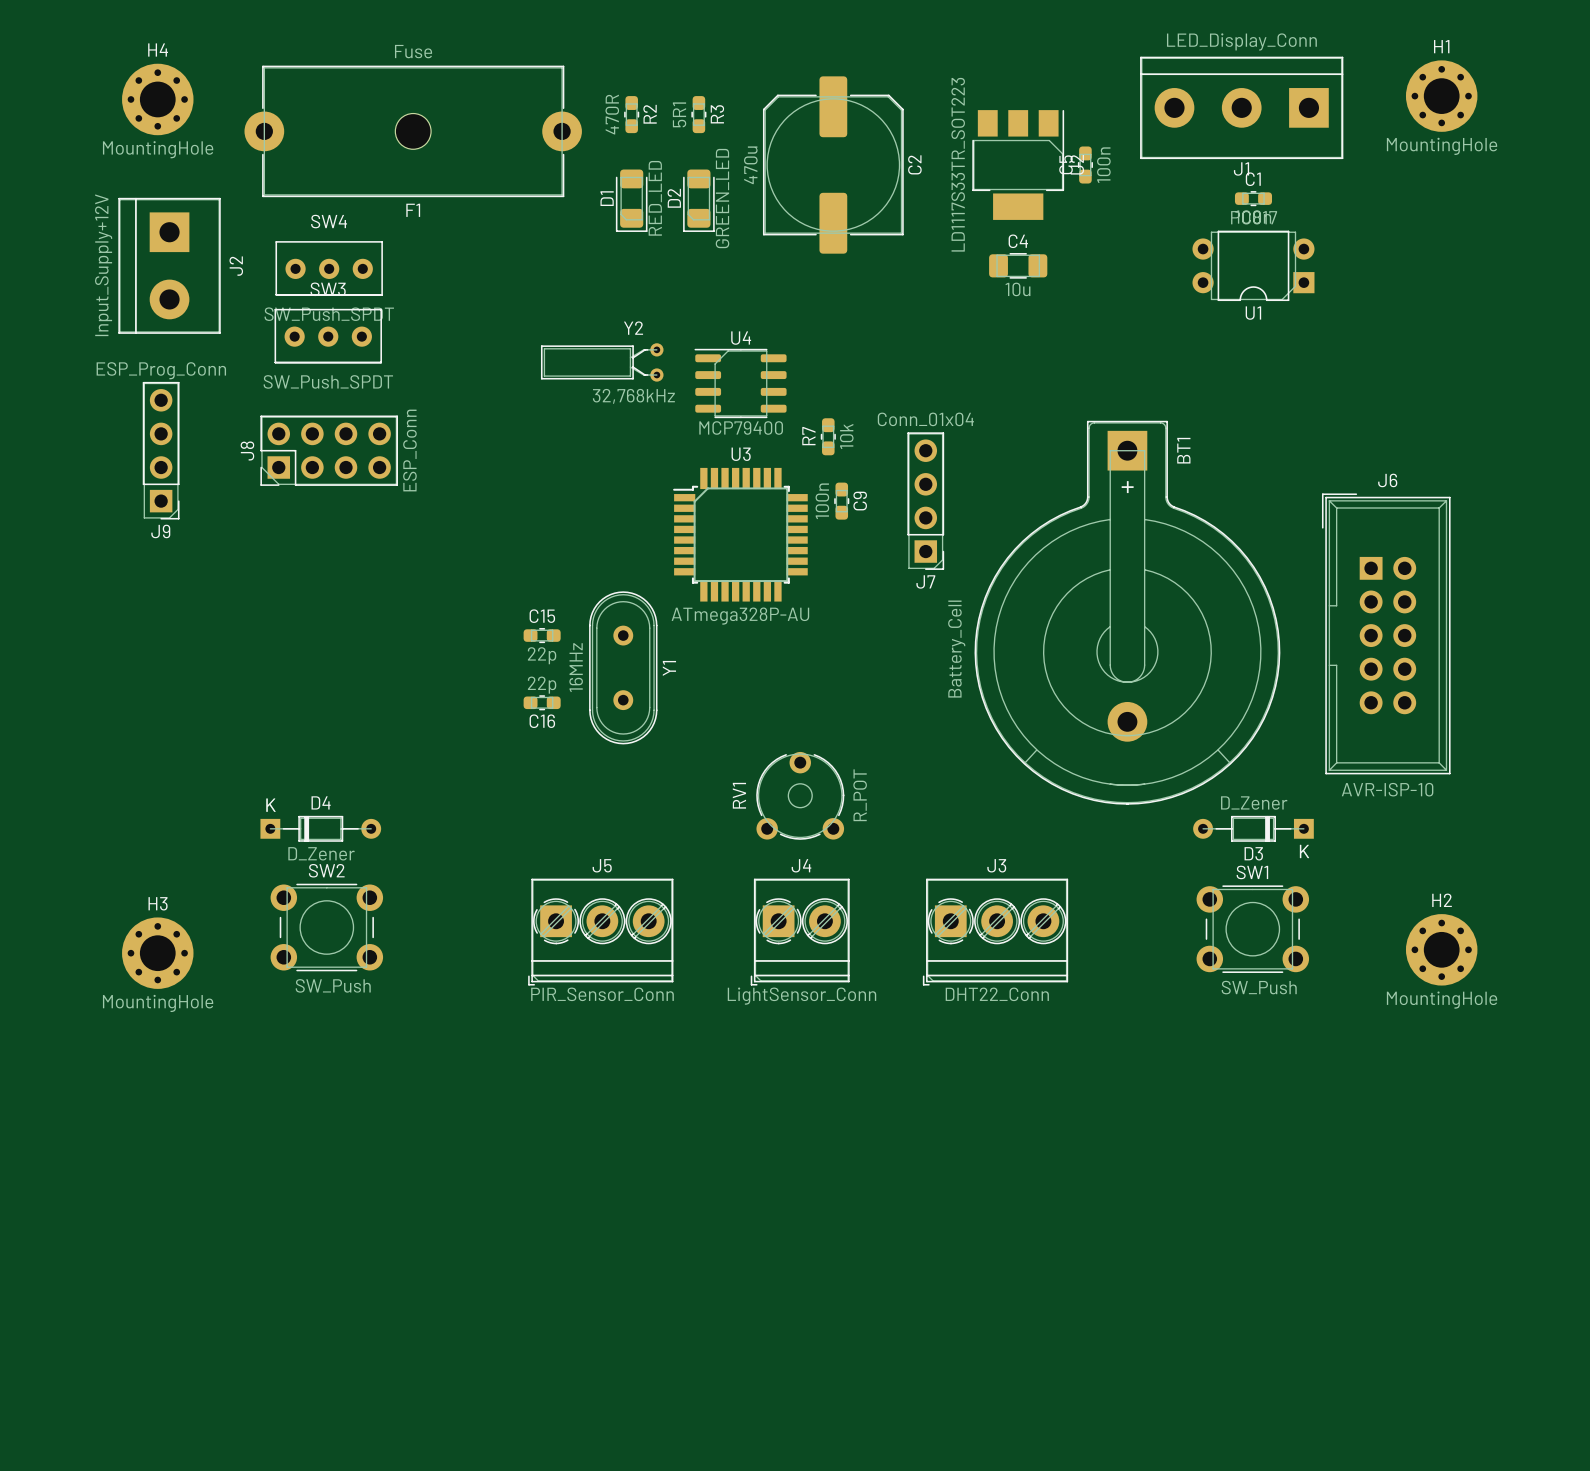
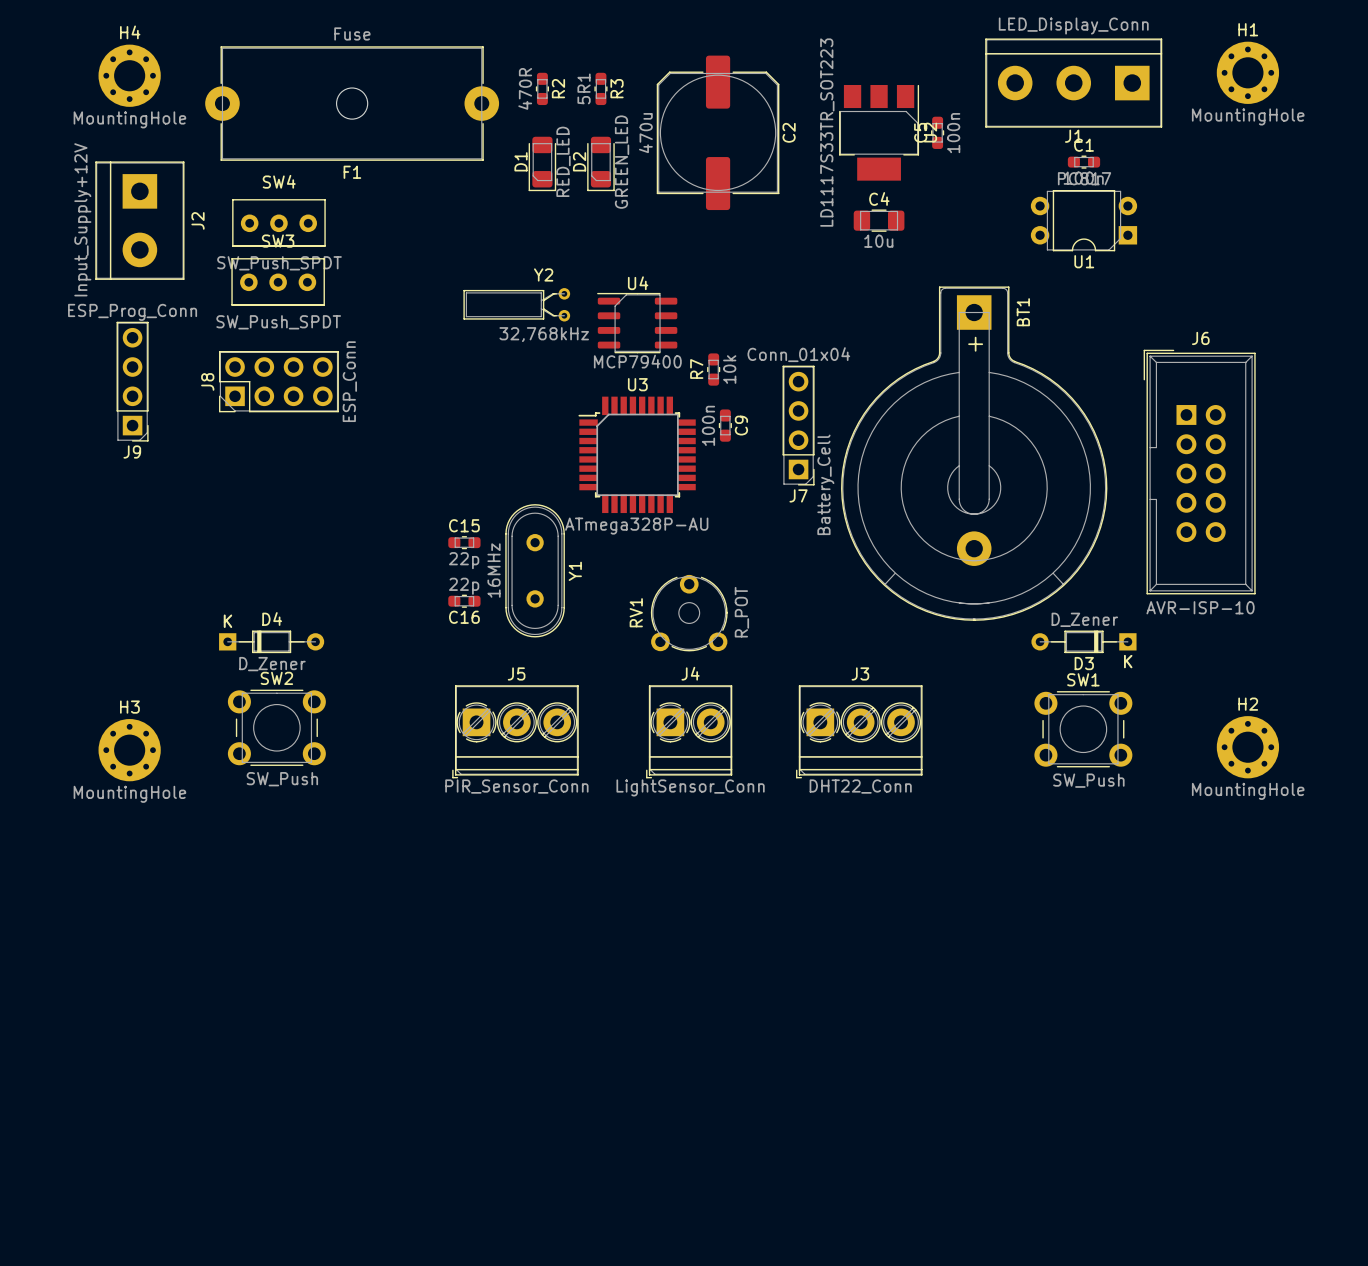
BT1 position: (1127, 612) -> (974, 453)
J6 position: (1386, 633) -> (1199, 472)
RV1 position: (800, 795) -> (689, 613)
D4 position: (320, 828) -> (271, 641)
D3 position: (1253, 828) -> (1083, 641)
SW2 position: (326, 927) -> (276, 727)
SW1 position: (1252, 929) -> (1083, 729)
J5 position: (600, 932) -> (515, 731)
J4 position: (800, 932) -> (689, 731)
J3 position: (995, 932) -> (859, 731)
H2 position: (1441, 949) -> (1247, 747)
H3 position: (157, 953) -> (129, 750)

